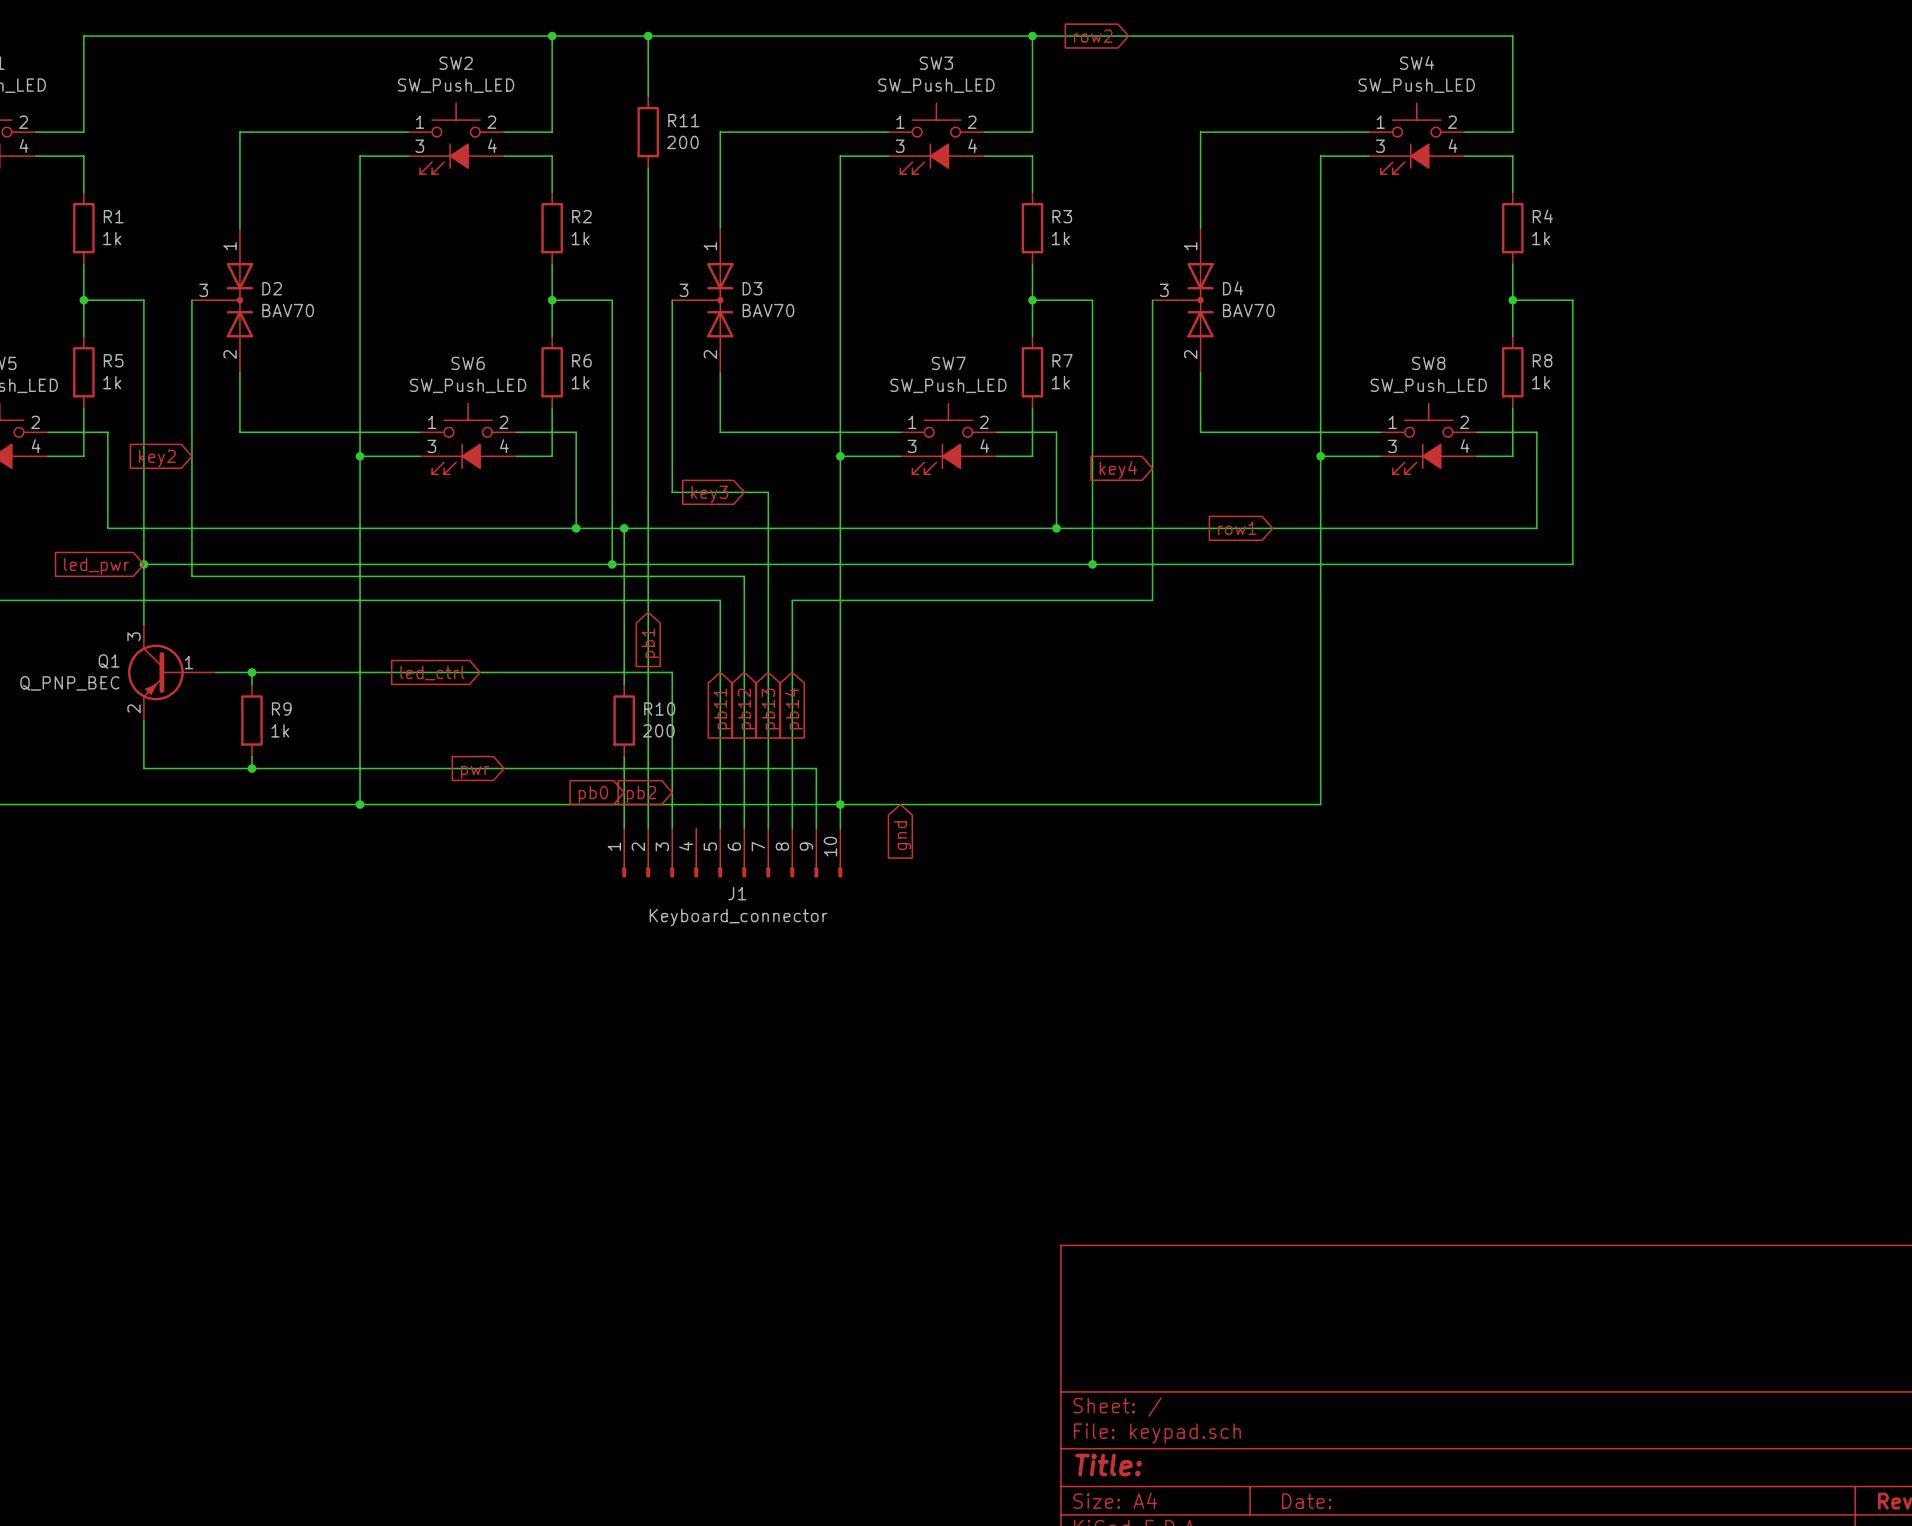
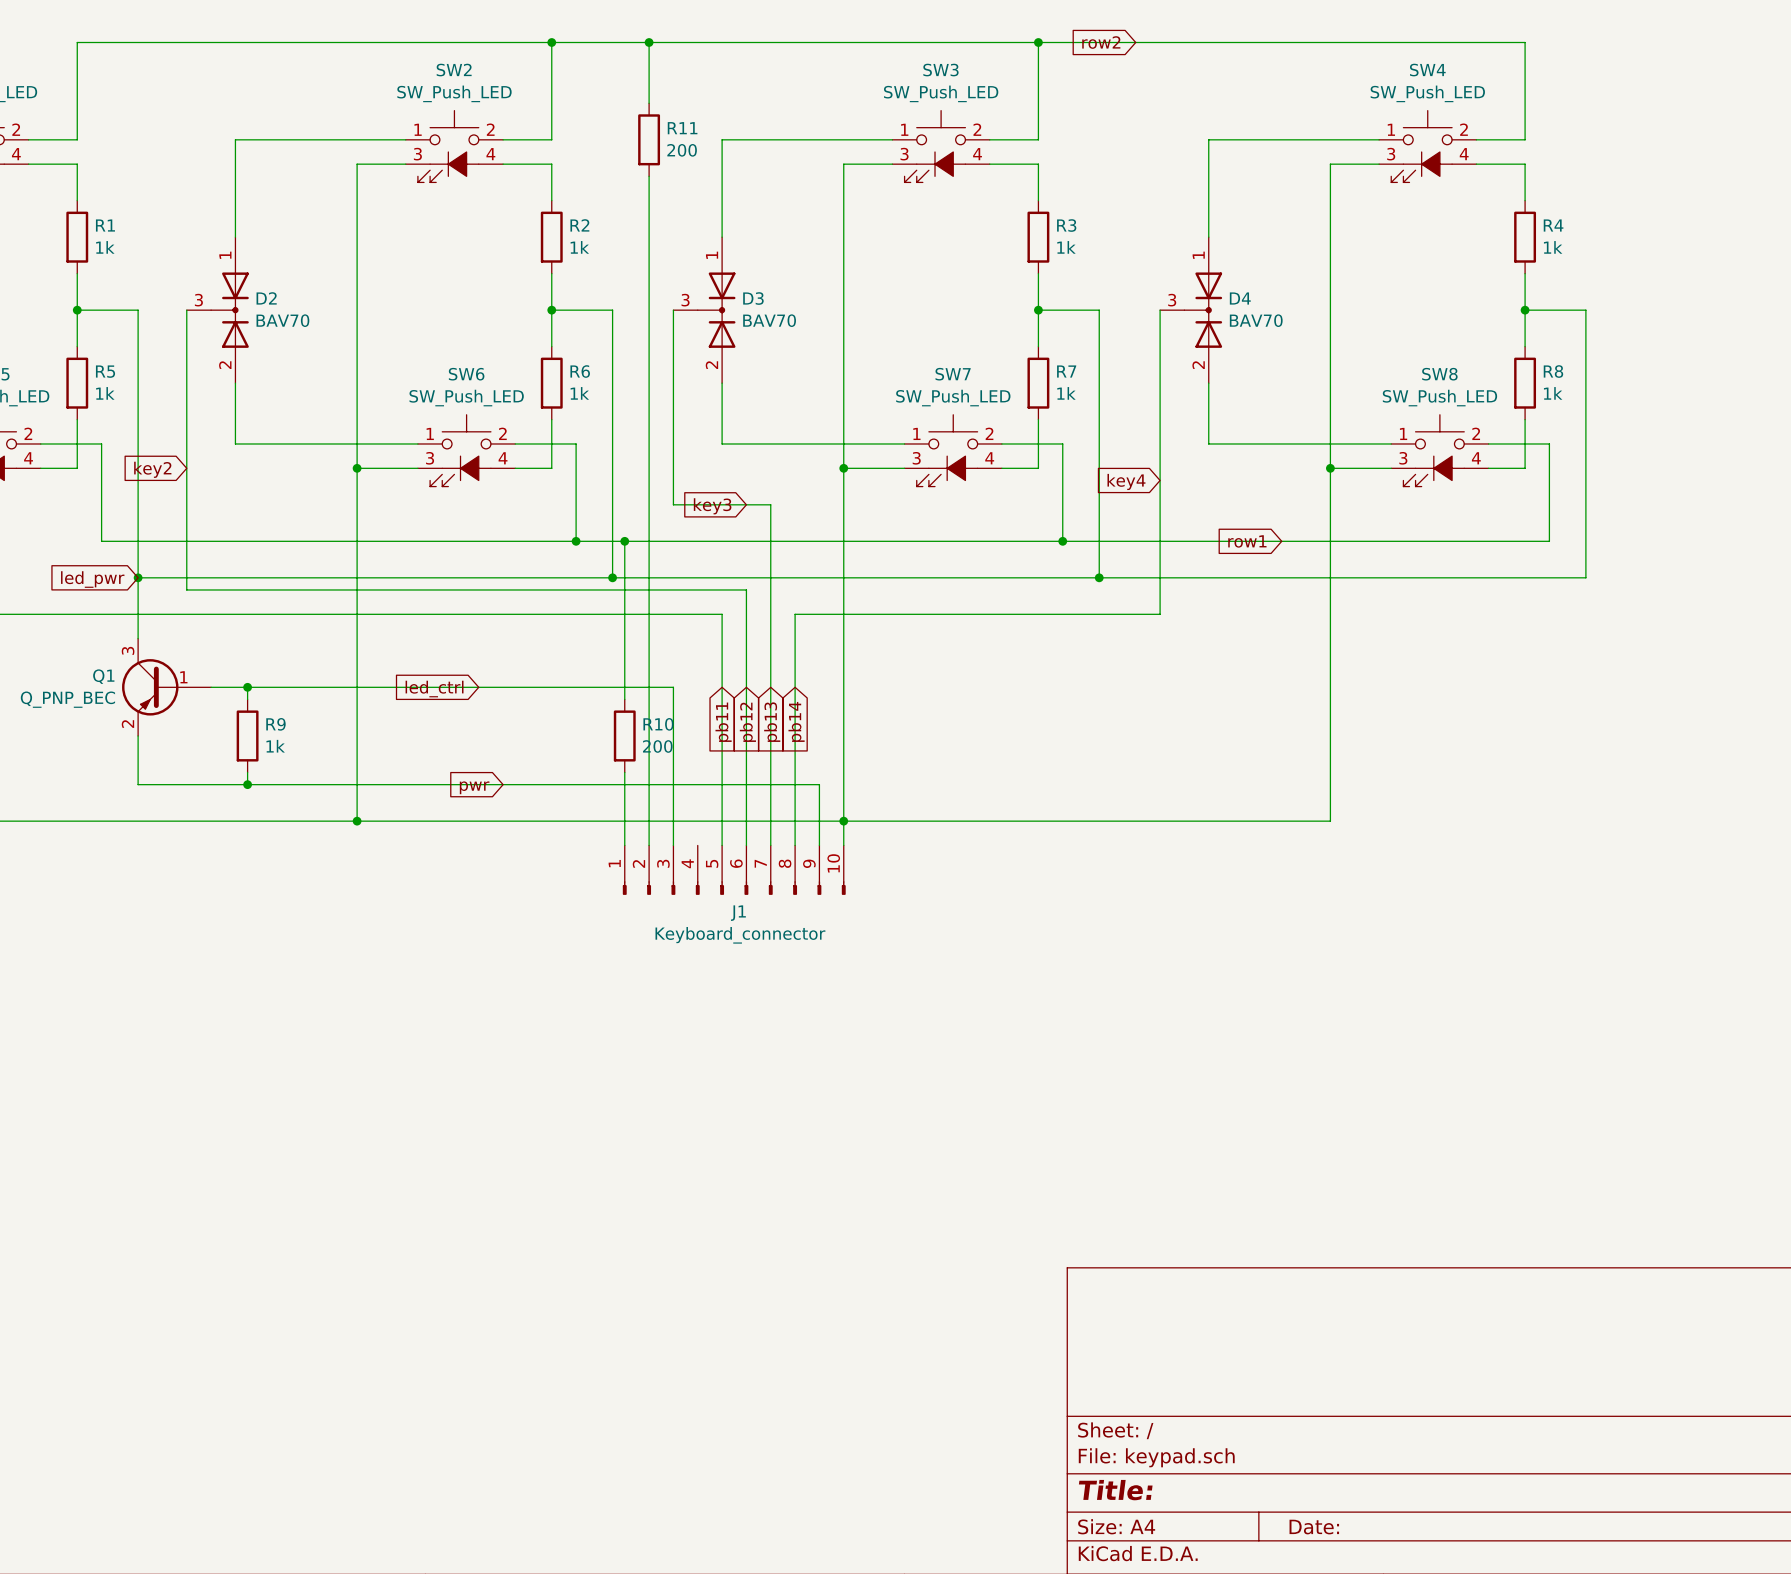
global label: pb1 (650, 643) -> none
global label: pb0 (593, 794) -> none
global label: pb2 (641, 794) -> none
global label: gnd (902, 835) -> none

